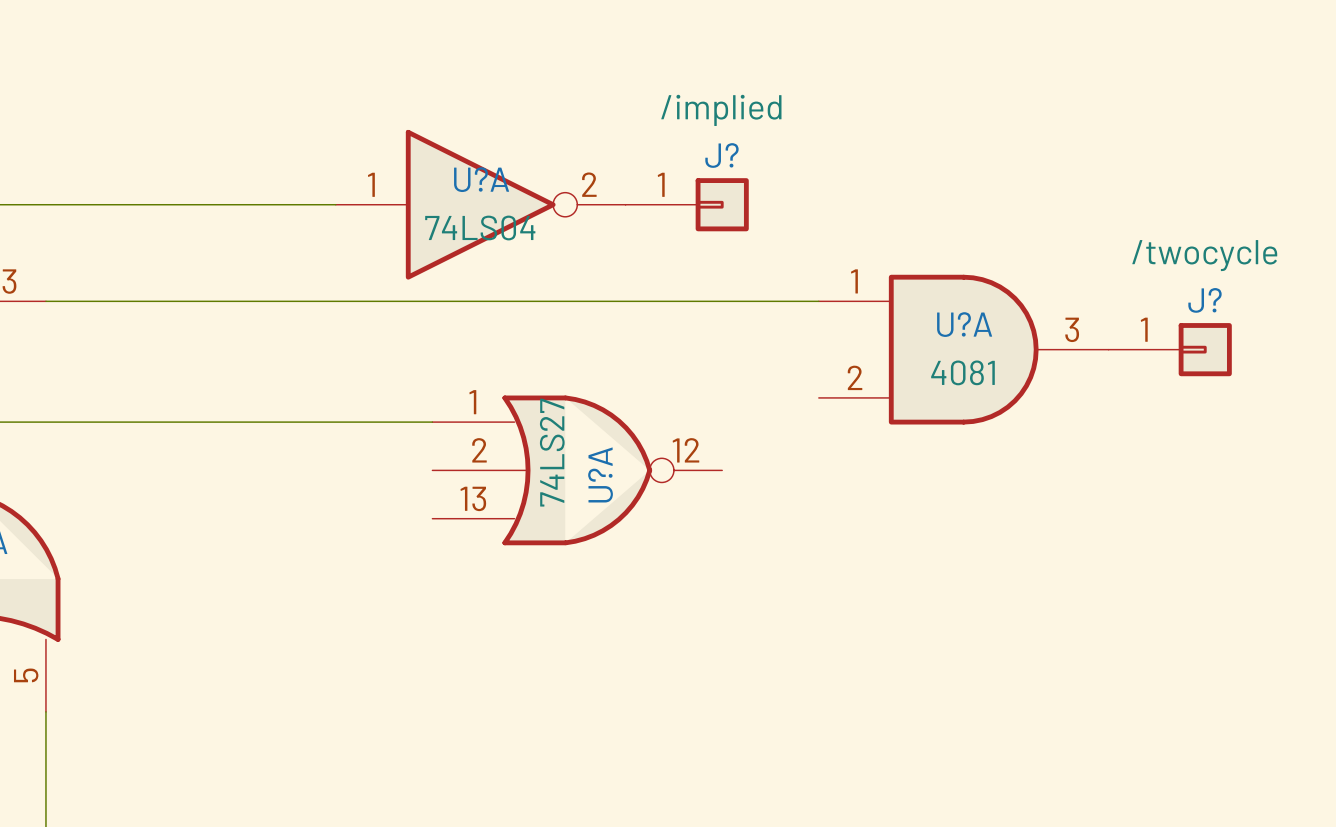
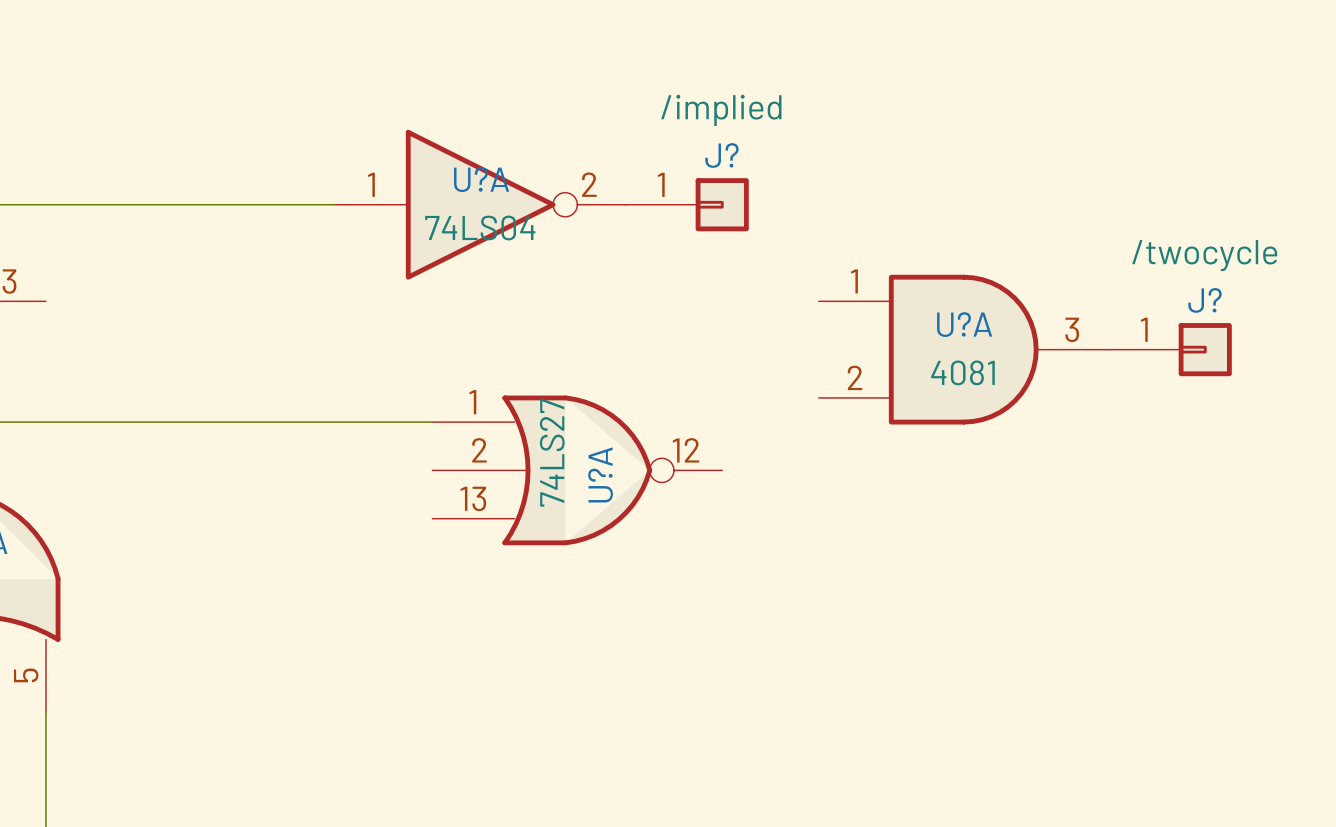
wire: (45, 301) (818, 301) -> none

